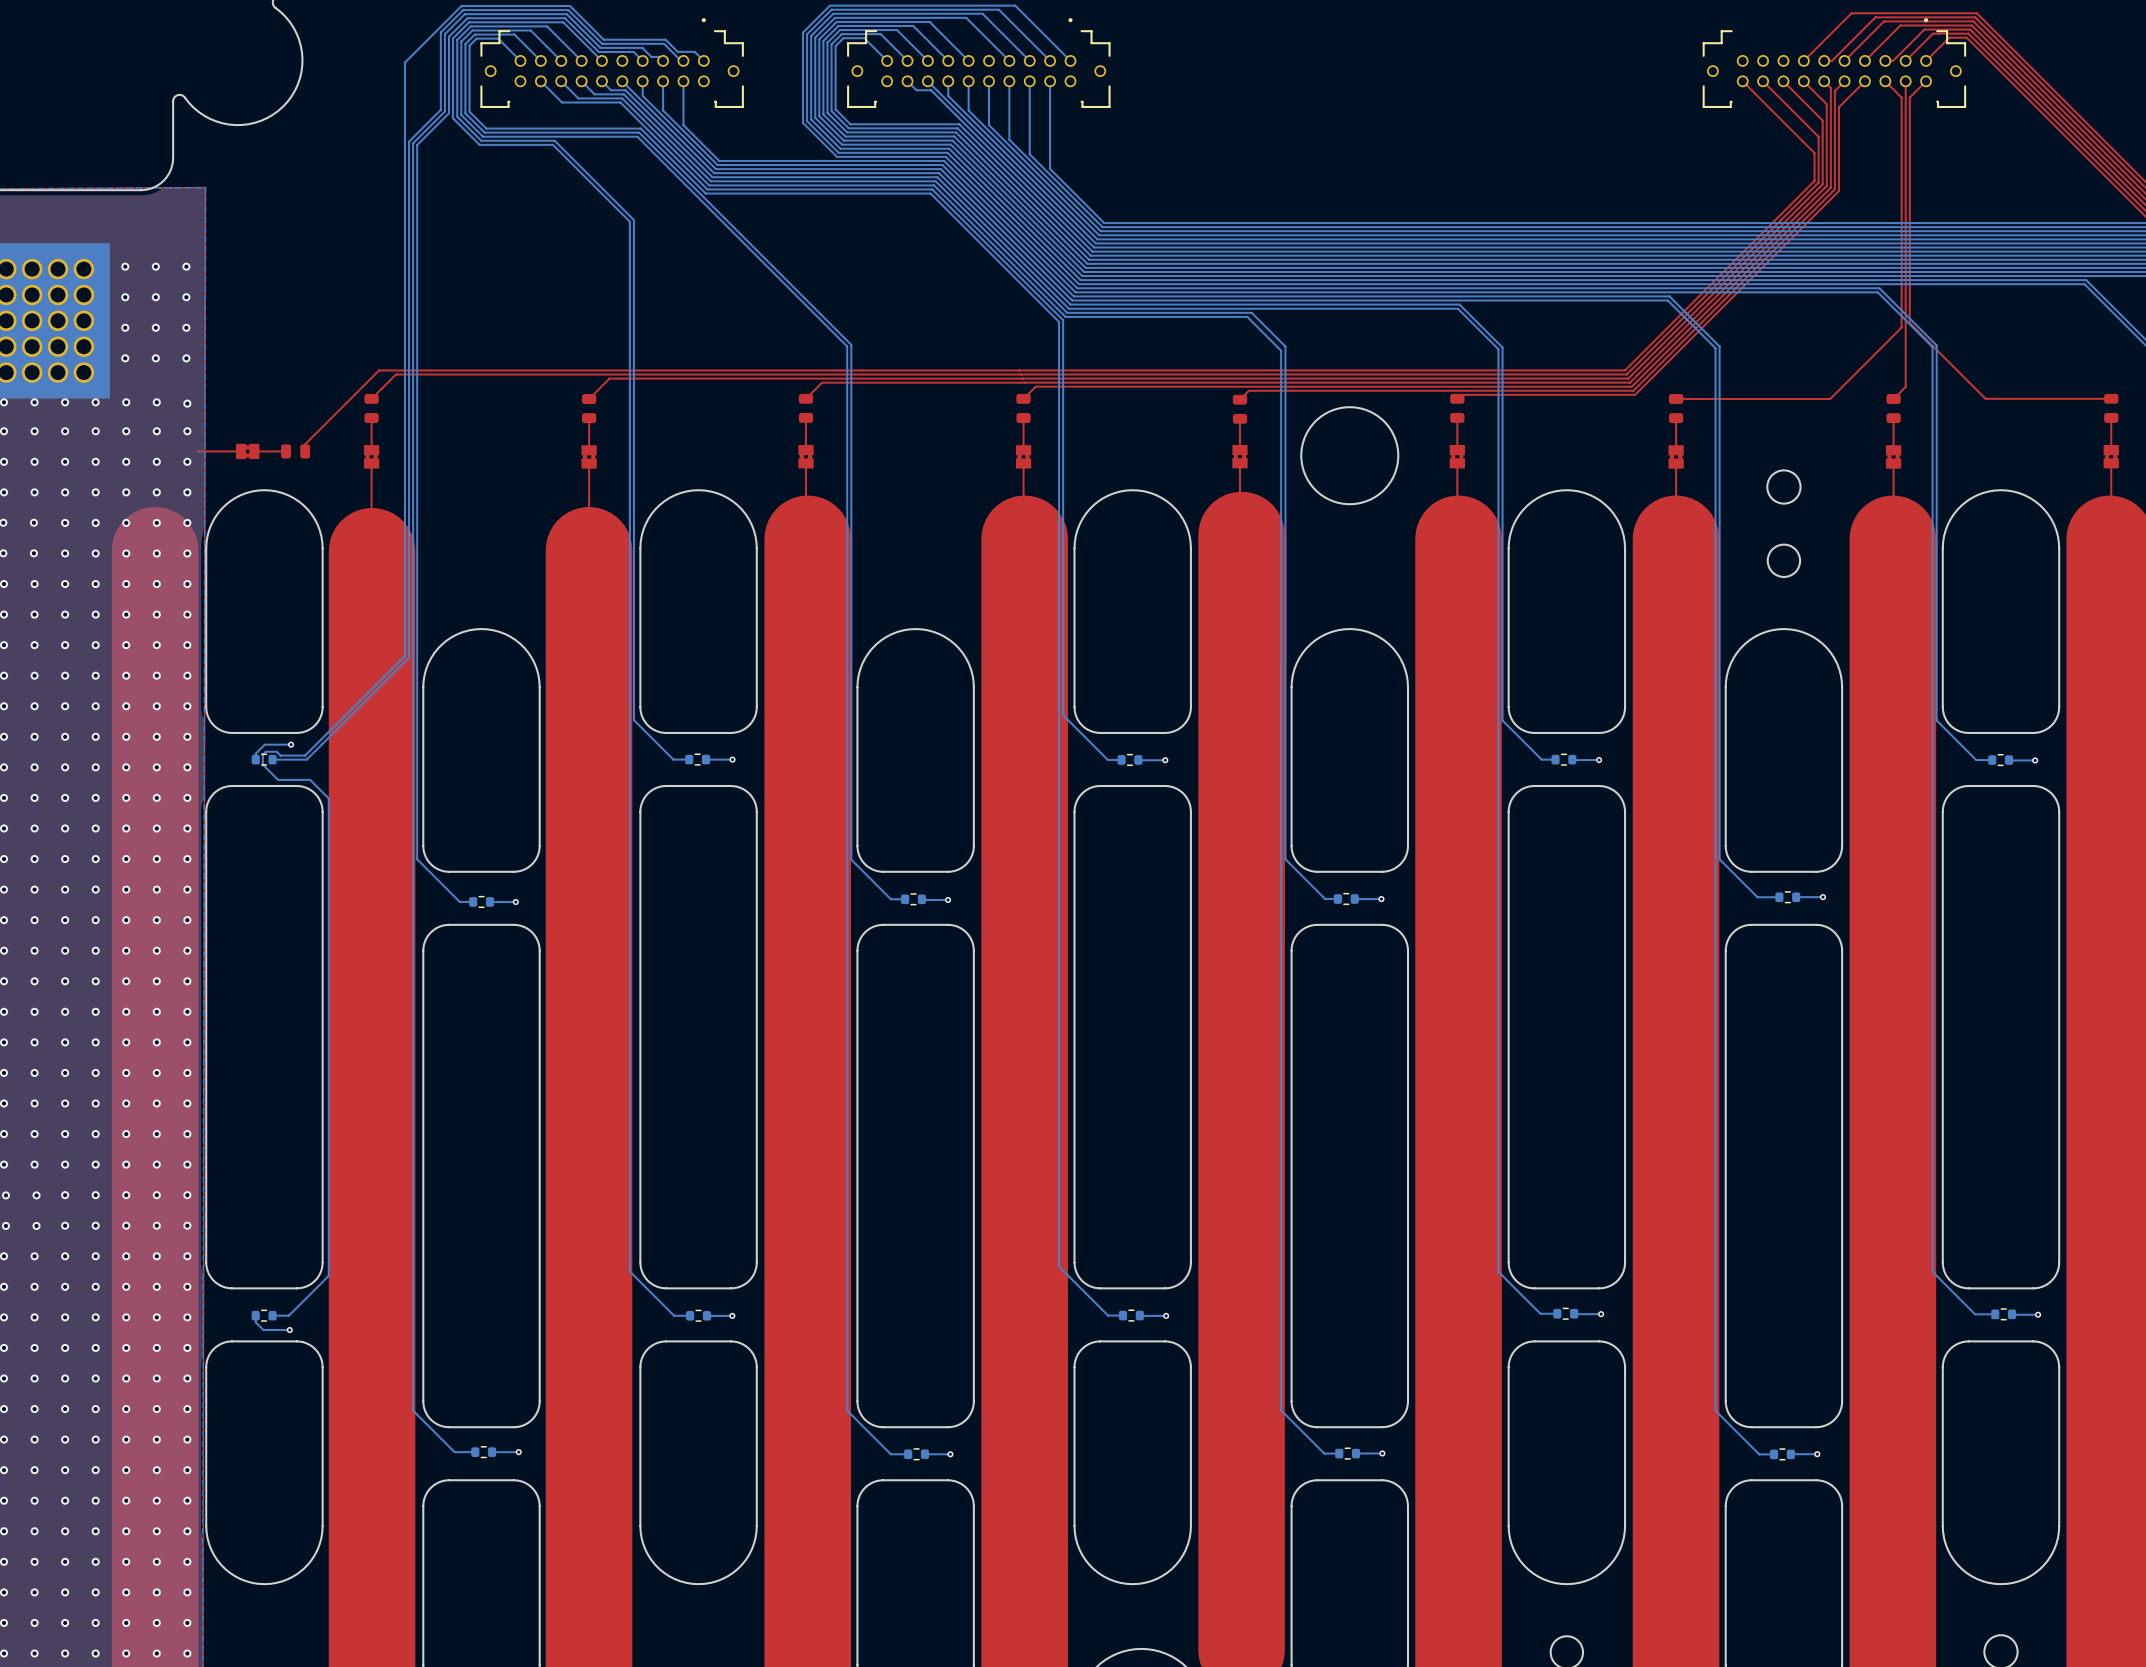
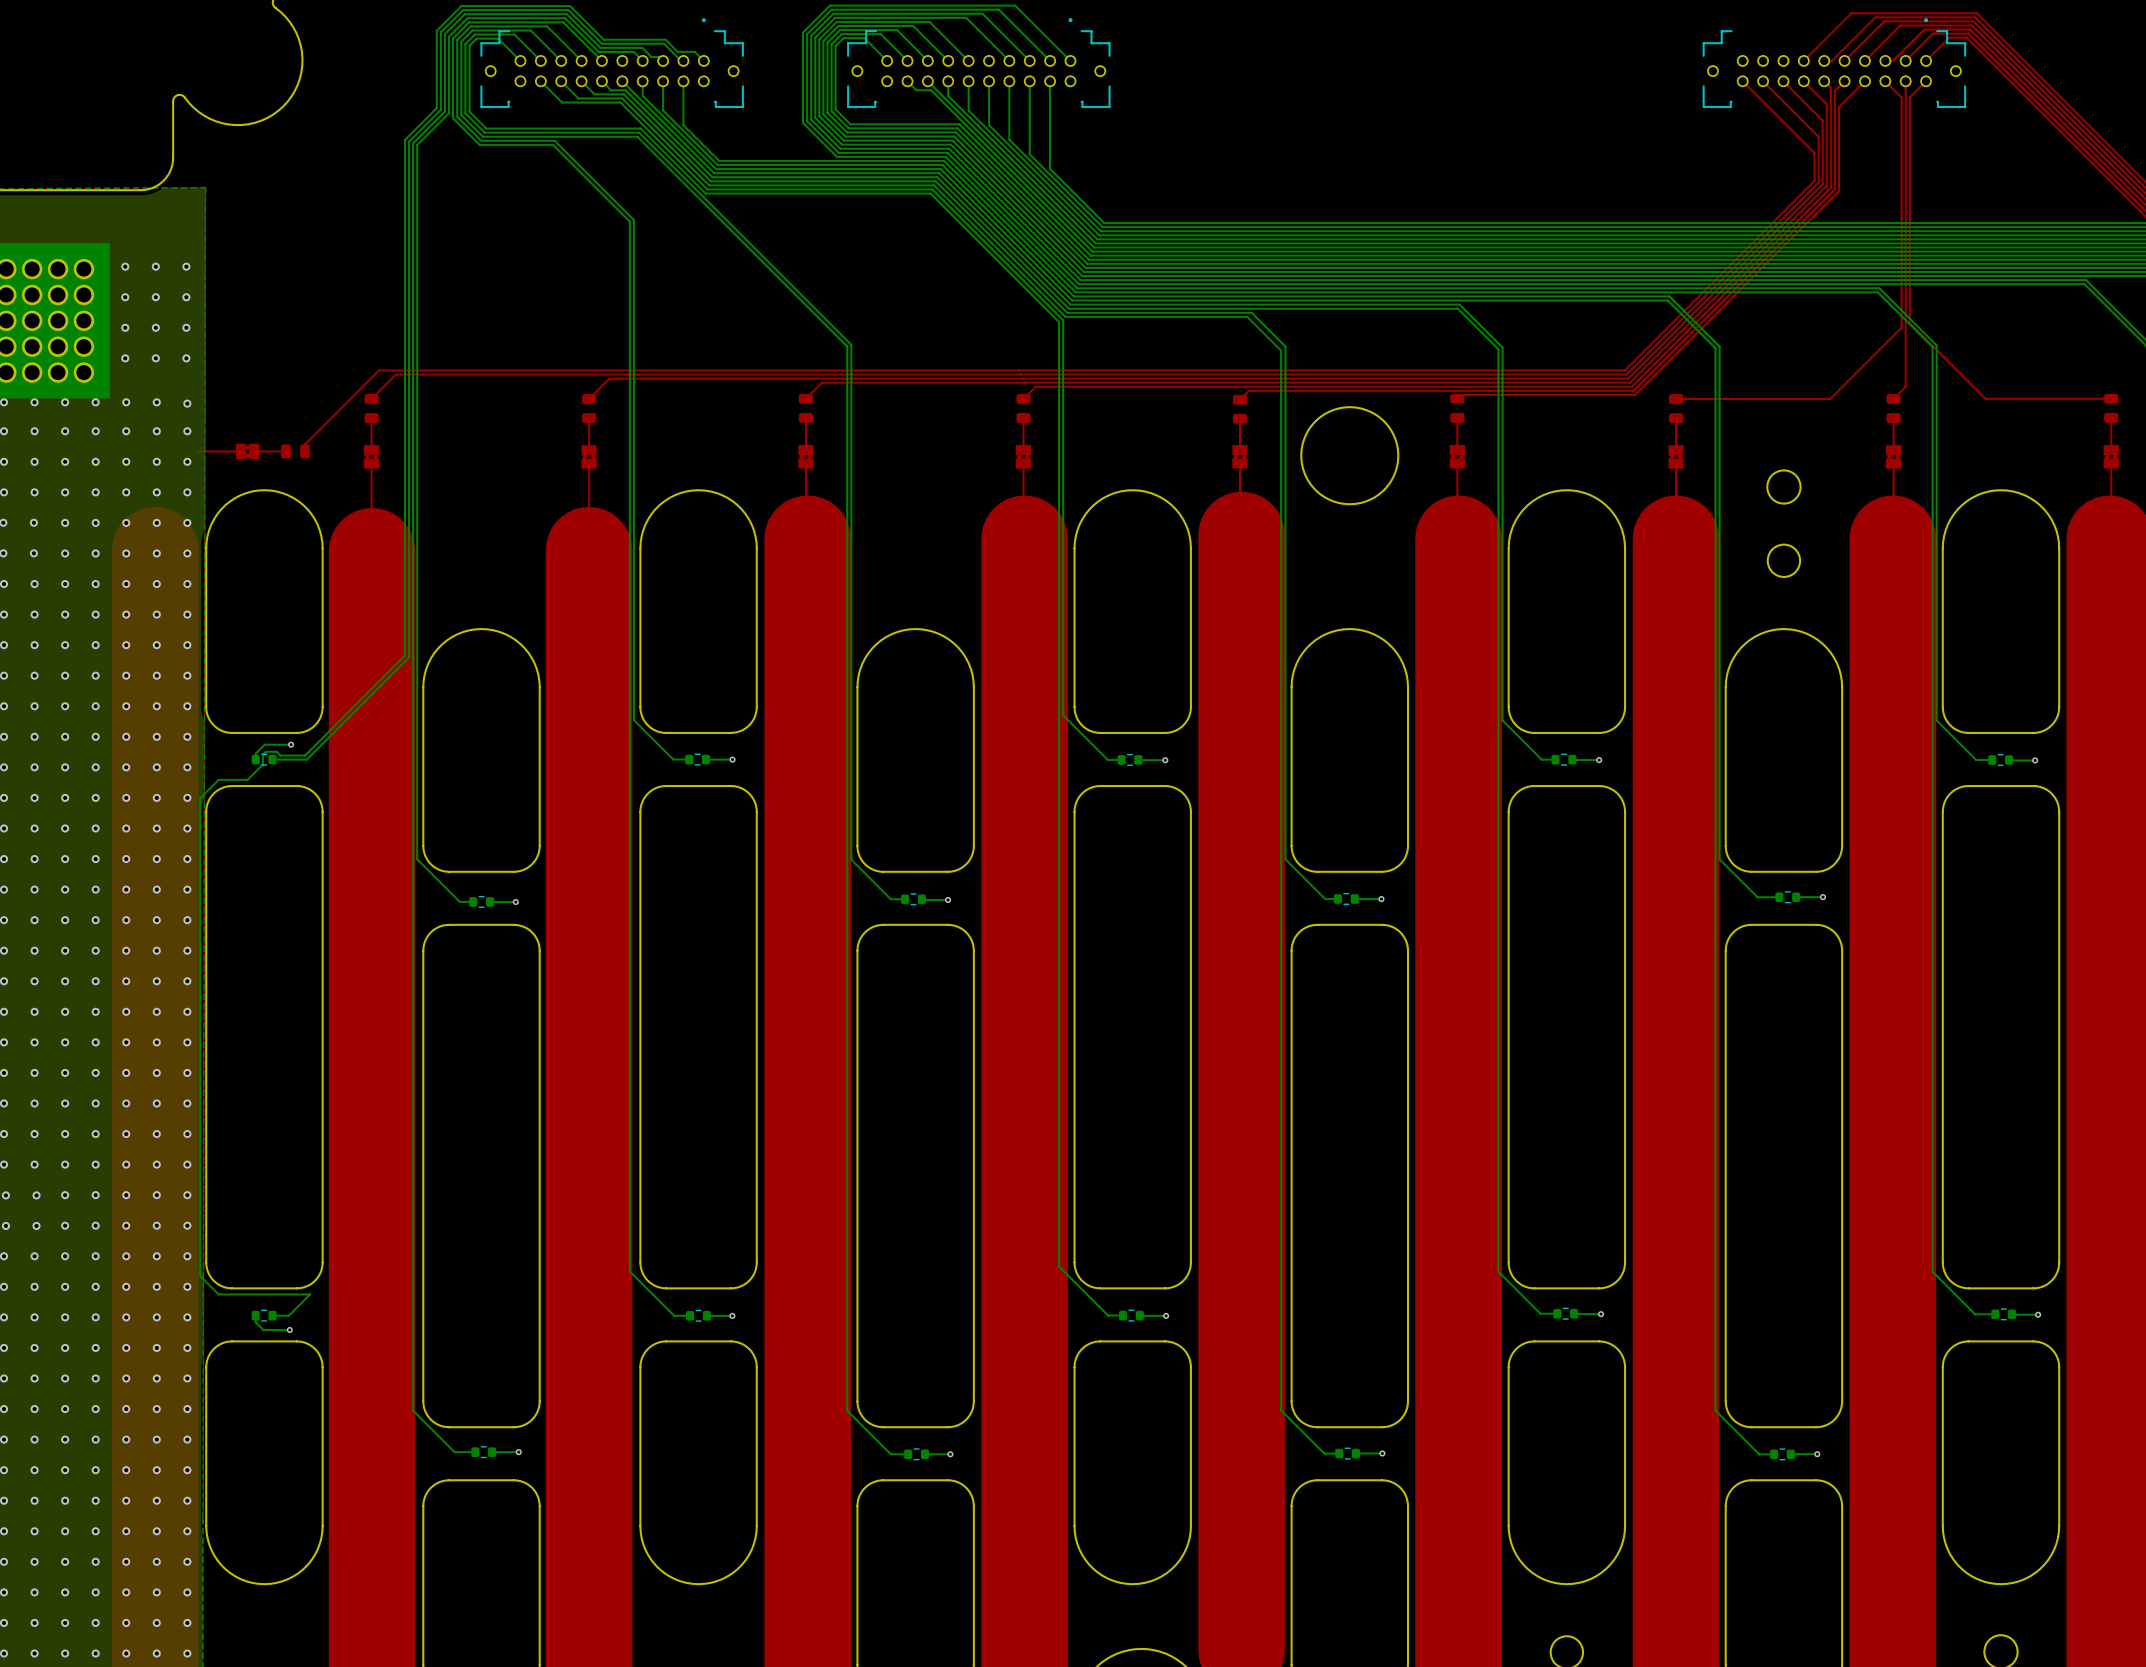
bottom track: (436, 30) (404, 62) (404, 139) -> (436, 30) (436, 108) (404, 139)
bottom track: (262, 764) (278, 779) (310, 779) (328, 798) (328, 1275) (310, 1294) -> (262, 764) (247, 779) (218, 779) (200, 798) (200, 1275) (218, 1294) (310, 1294)

